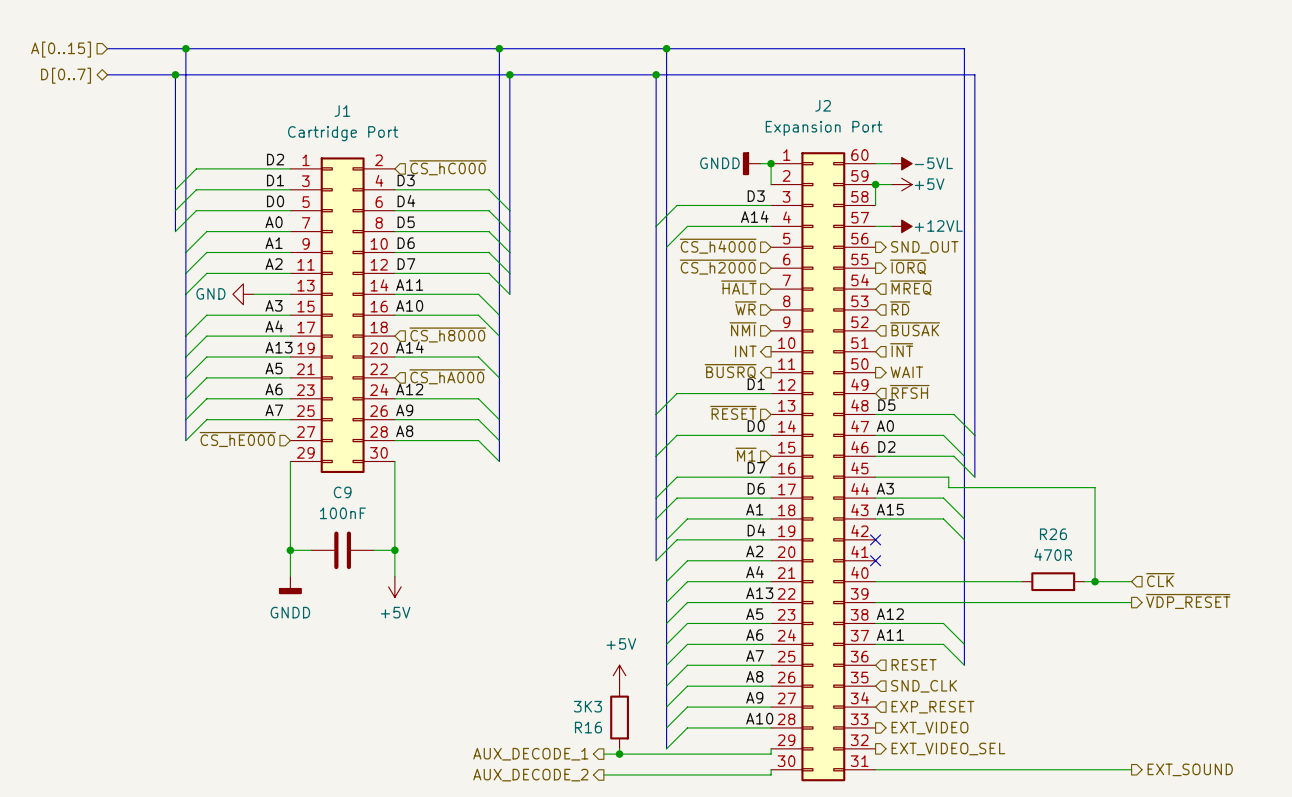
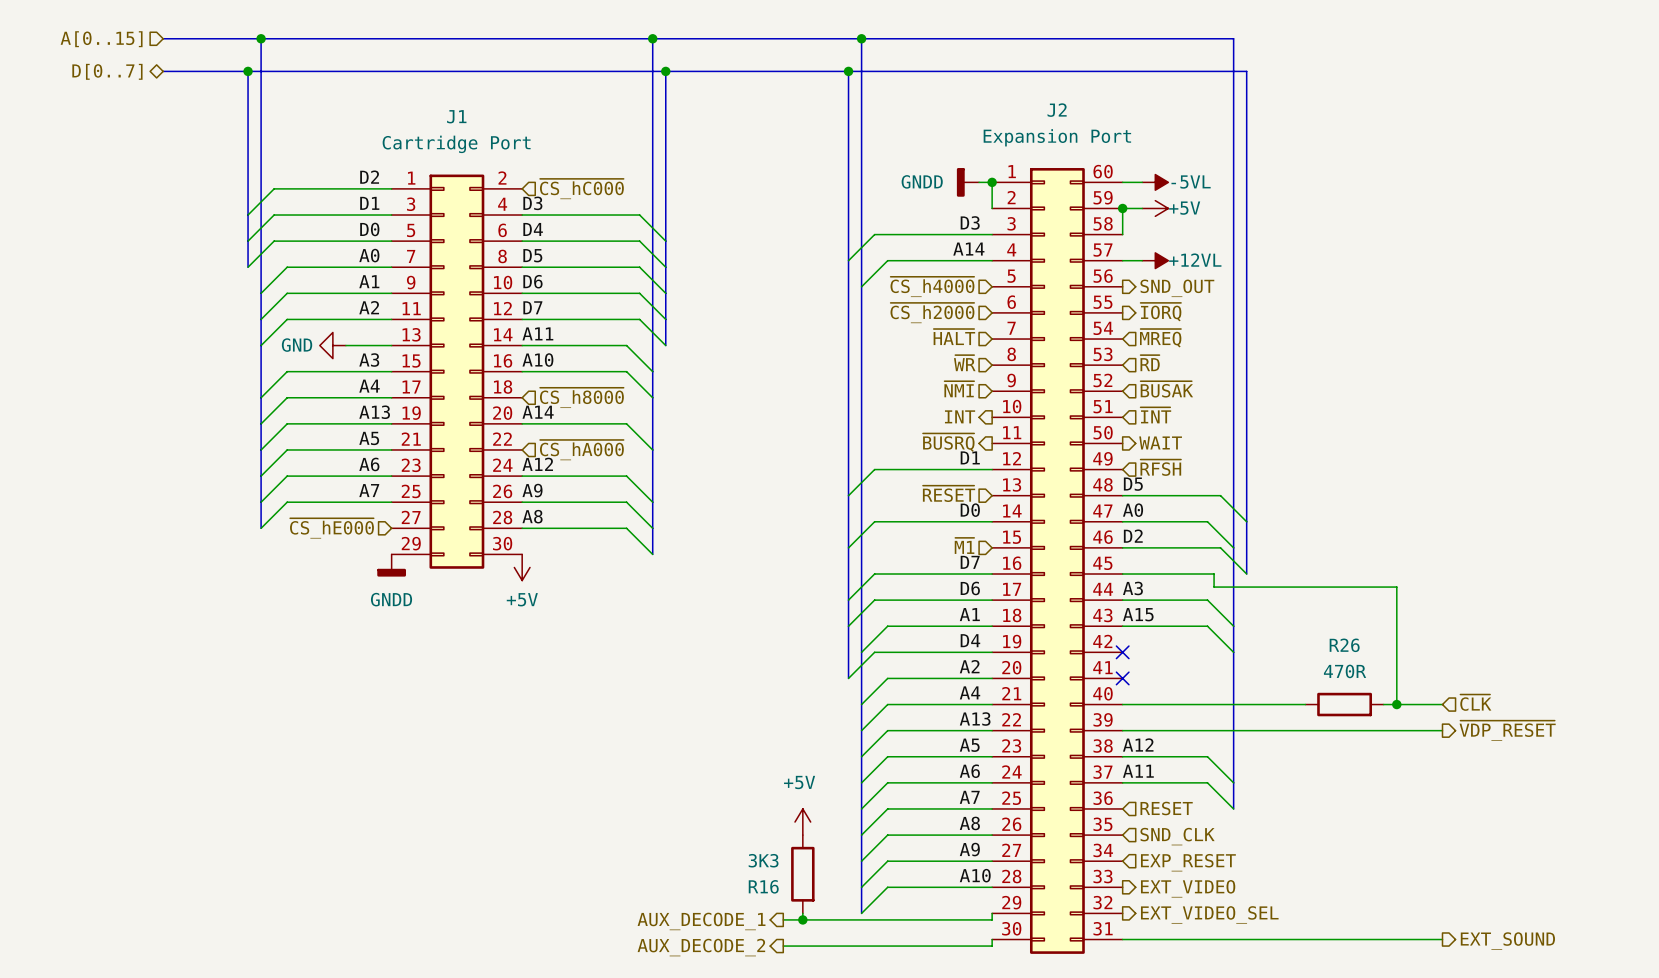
wire: (290, 461) (290, 576) -> none
wire: (394, 461) (394, 576) -> none
wire: (290, 550) (311, 550) -> none
junction: (290, 550) -> none
C9: 100nF (342, 550) -> none
wire: (373, 550) (394, 550) -> none
junction: (394, 550) -> none
power symbol position: GNDD (290, 585) -> GNDD (391, 565)
power symbol position: +5V (394, 586) -> +5V (522, 567)

